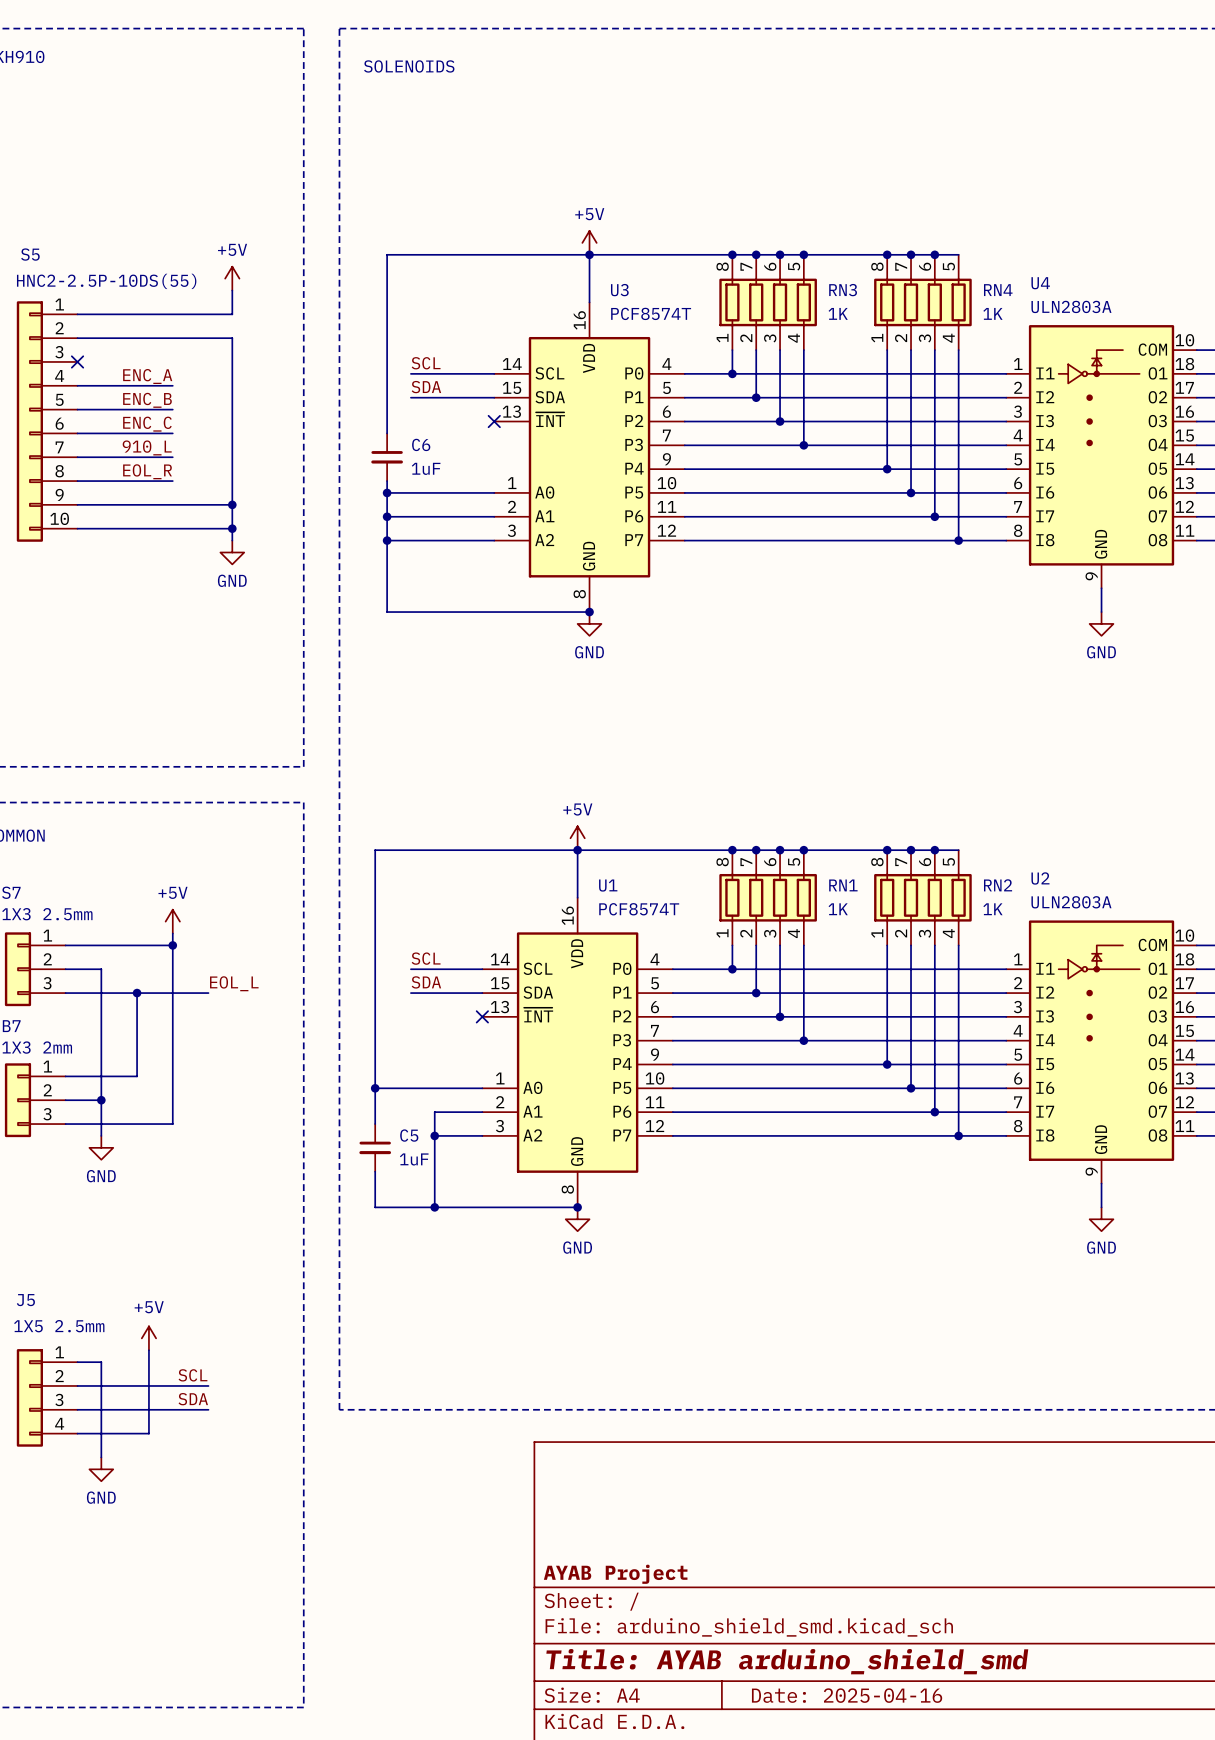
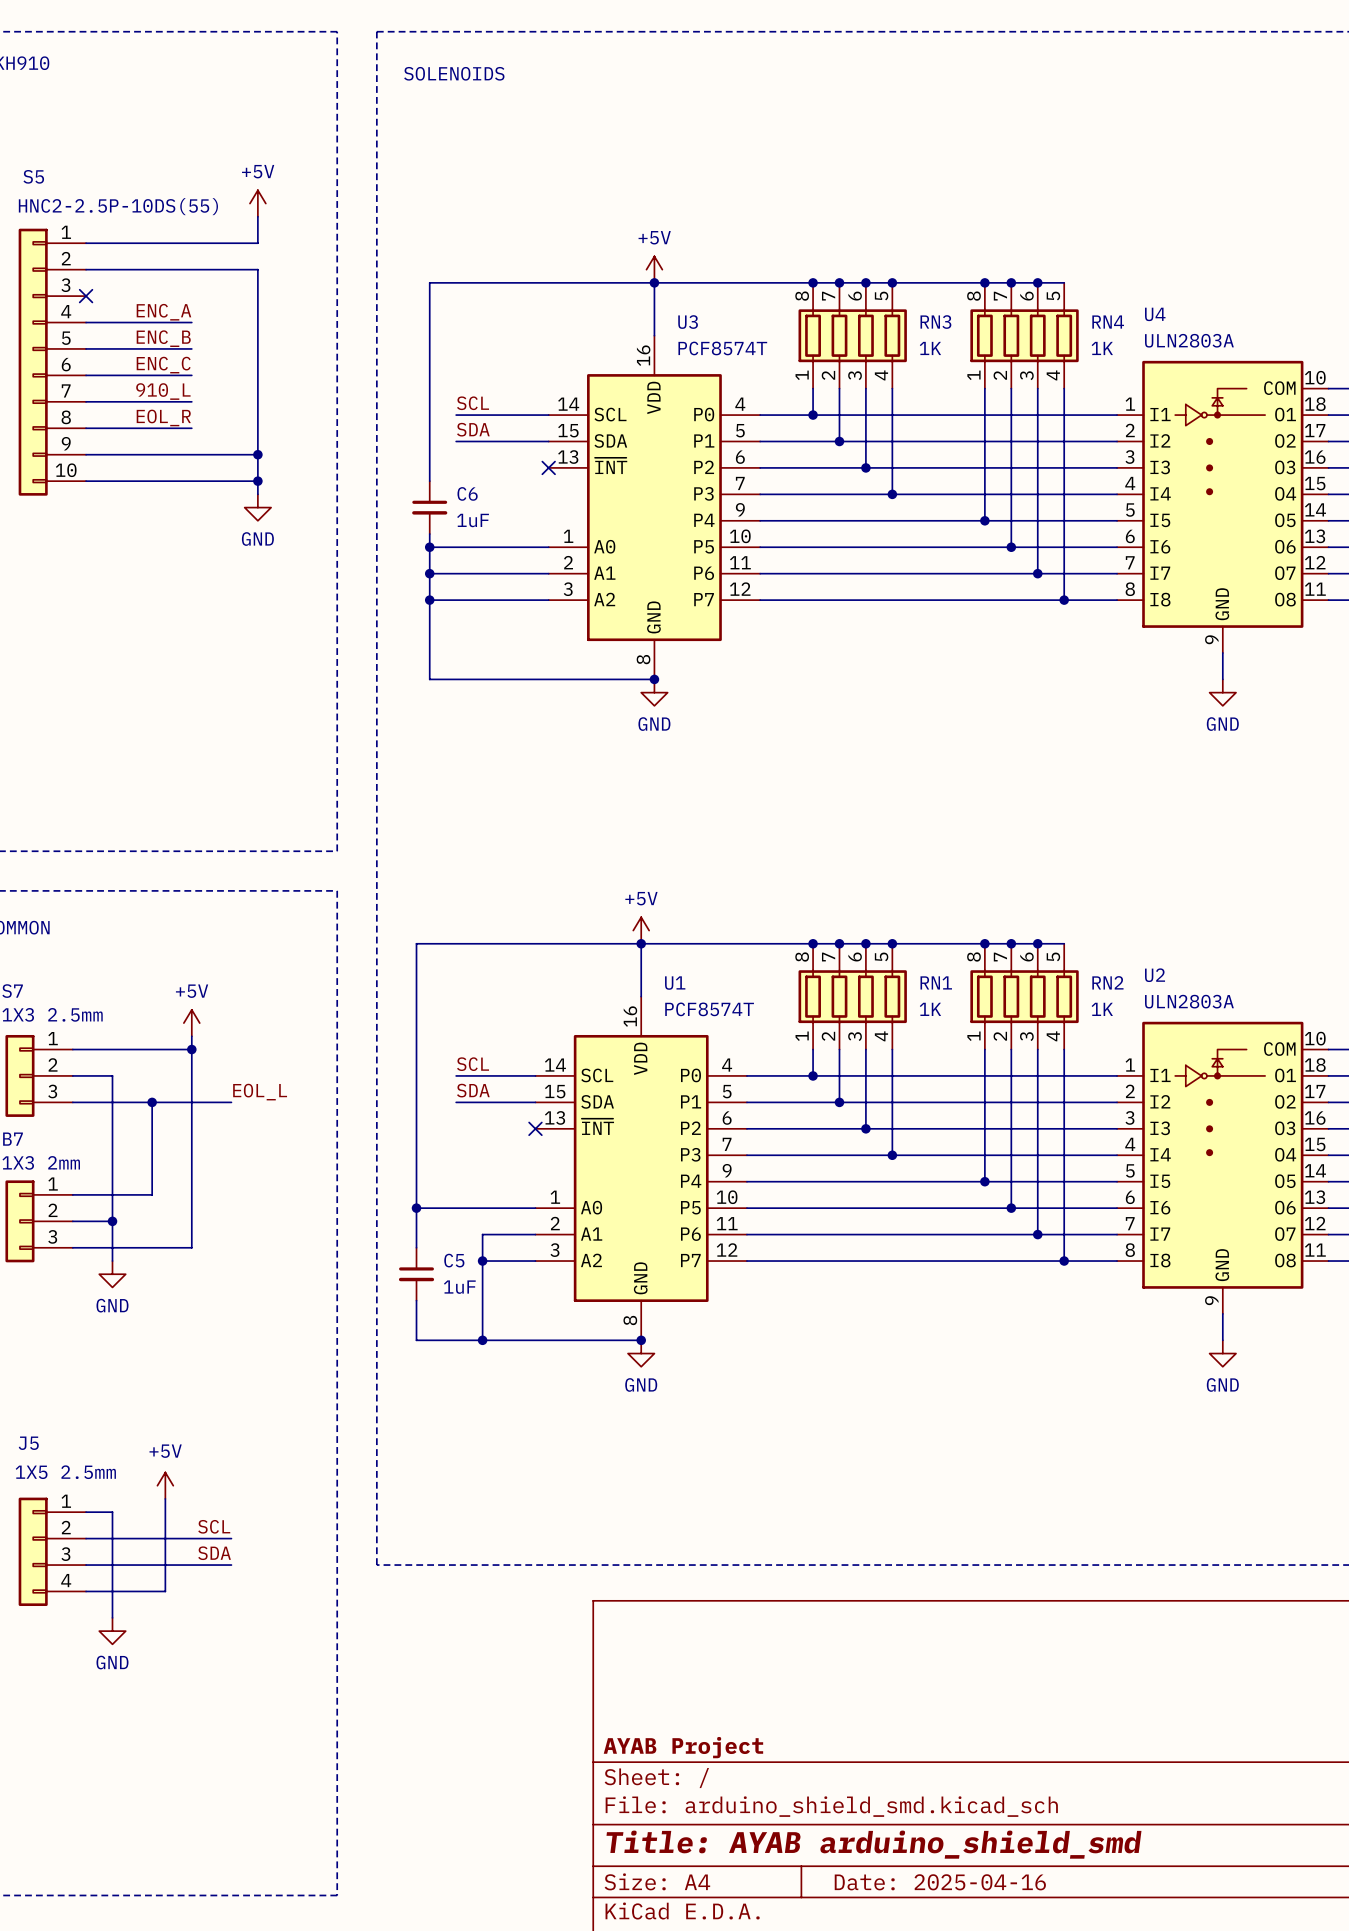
wire: none -> (257, 216) (257, 243) (86, 243)
wire: none -> (86, 269) (257, 269) (257, 322)
no-connect mark: none -> (86, 296)
power symbol position: +5V (232, 278) -> +5V (257, 203)
label: none -> ENC_A (163, 312)
wire: (172, 314) (232, 314) -> (257, 375) (257, 348)
wire: (172, 338) (232, 338) -> (191, 481) (257, 481)
no-connect mark: (77, 361) -> none
label: ENC_A (147, 376) -> EOL_R (163, 417)
label position: ENC_B (147, 400) -> ENC_B (163, 338)
wire: none -> (191, 454) (257, 454)
junction: none -> (257, 454)
S5 position: (47, 421) -> (52, 362)
label position: ENC_C (147, 424) -> ENC_C (163, 365)
junction: none -> (257, 481)
wire: (232, 445) (232, 540) -> none
label position: 910_L (147, 447) -> 910_L (163, 391)
wire: (77, 457) (172, 457) -> (86, 401) (191, 401)
label: EOL_R (147, 471) -> none
wire: (77, 481) (172, 481) -> (86, 322) (191, 322)
wire: (77, 504) (232, 504) -> none
junction: (232, 504) -> none
wire: (77, 528) (232, 528) -> none
junction: (232, 528) -> none
power symbol position: GND (232, 552) -> GND (257, 507)

